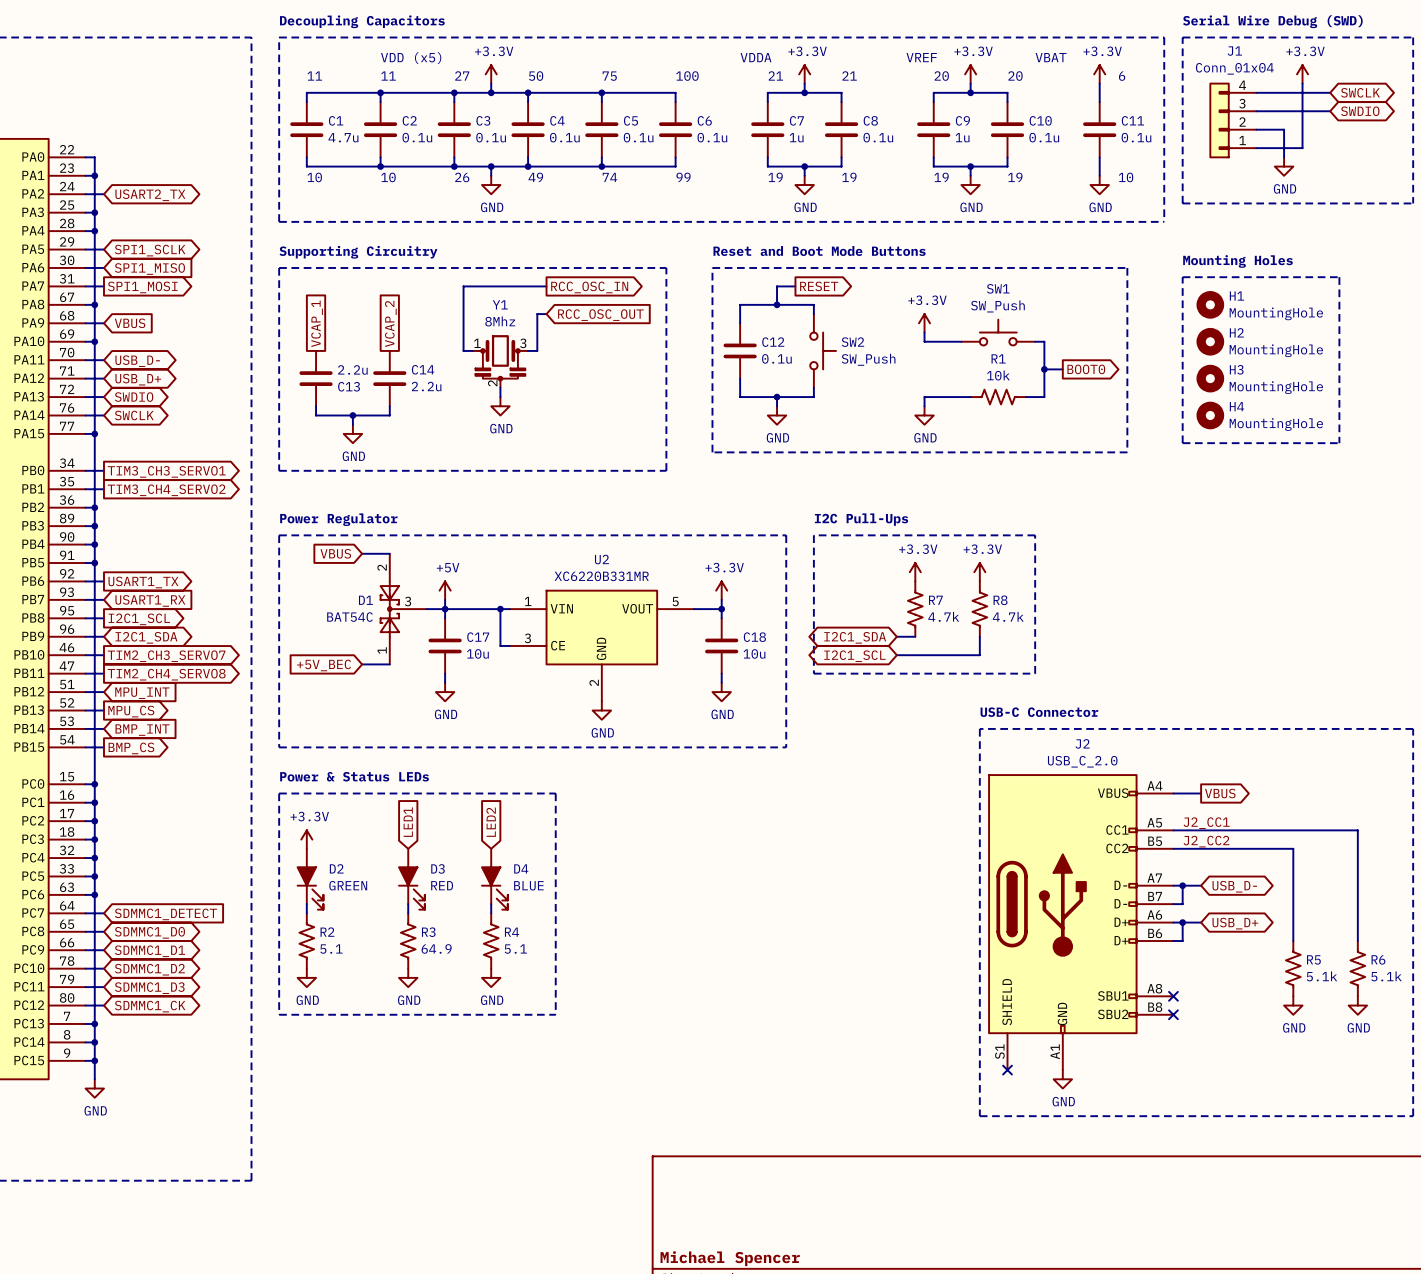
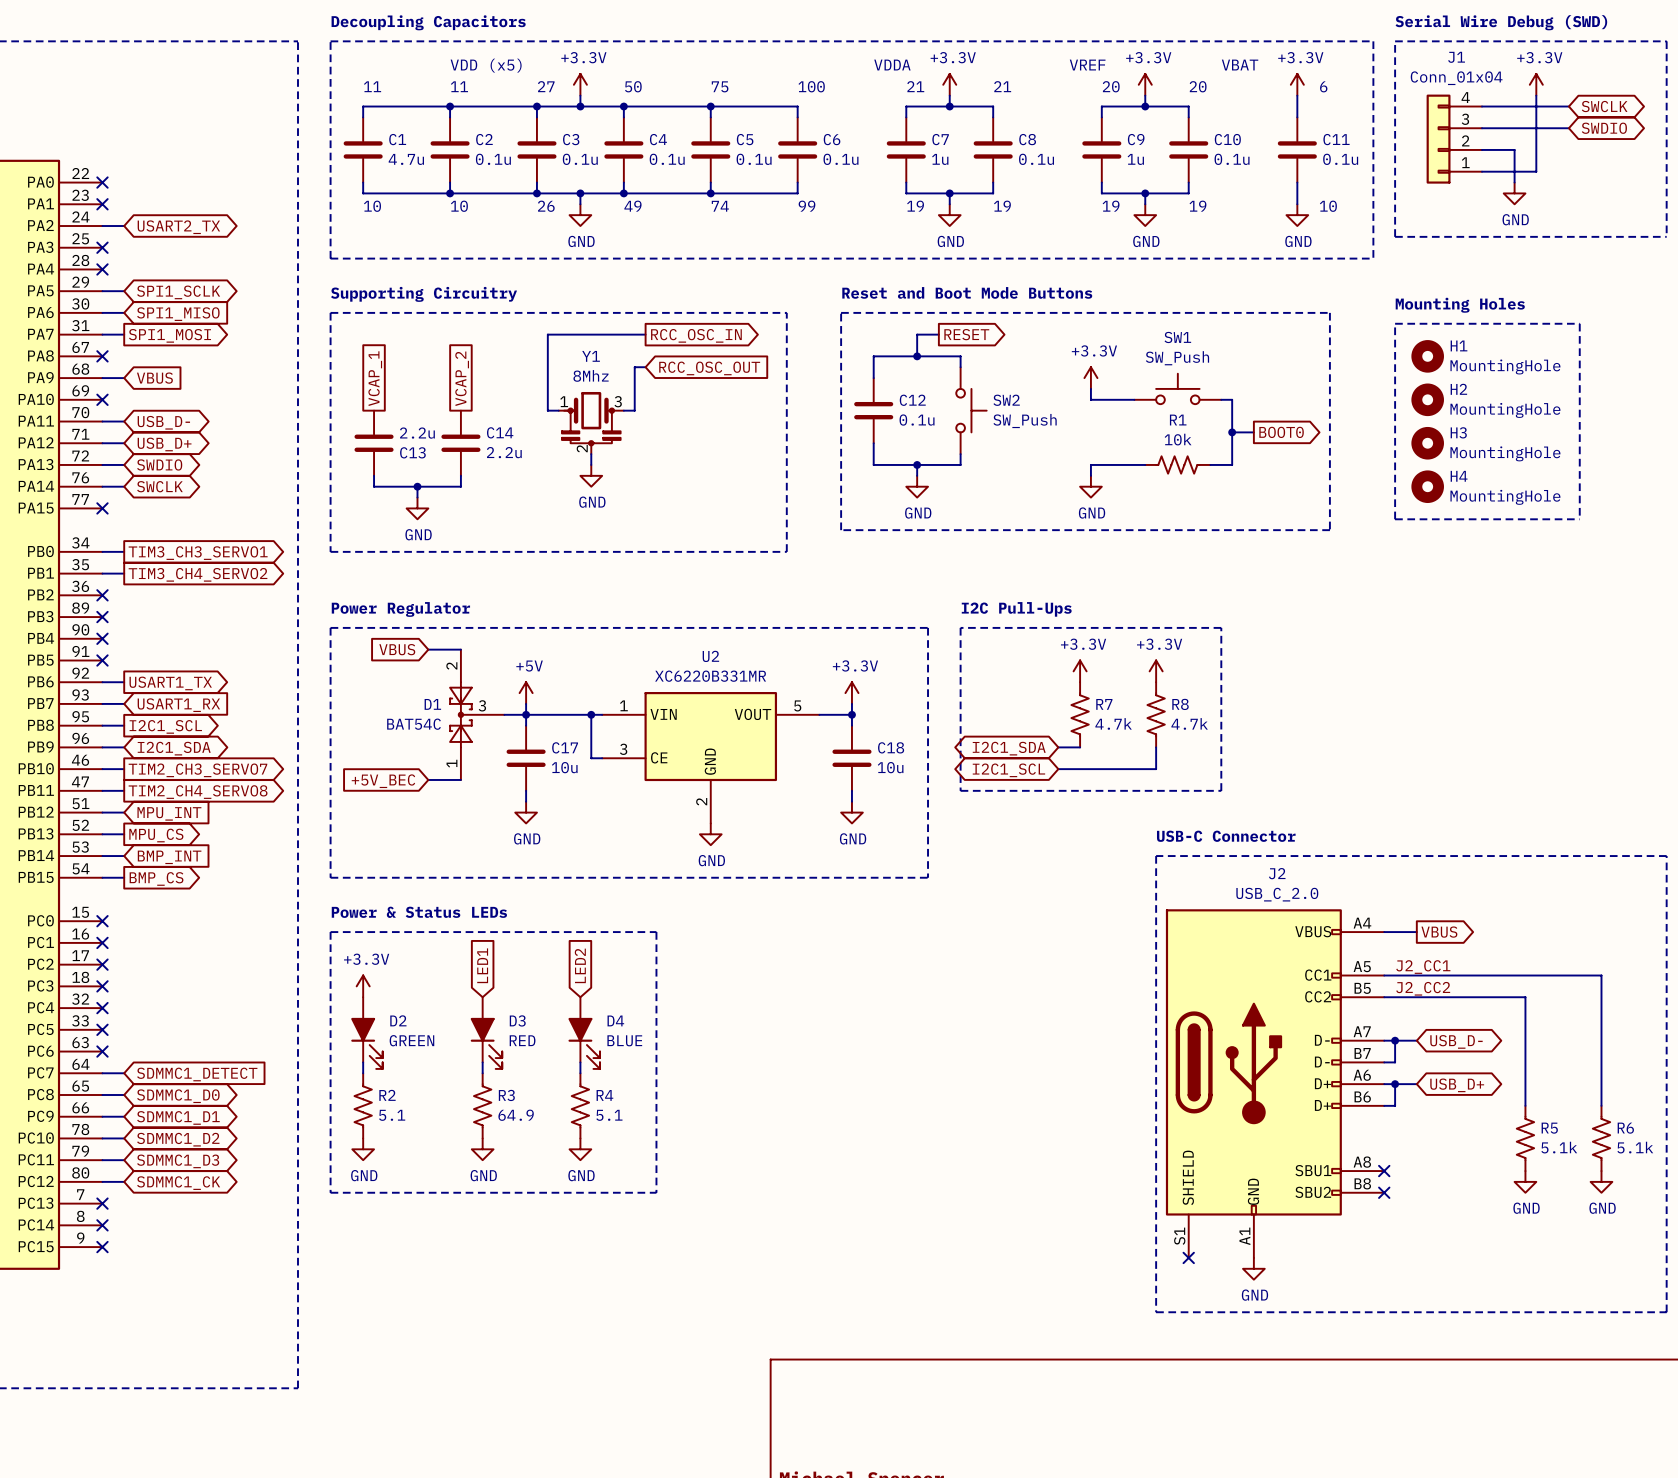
wire: (85, 157) (94, 157) (94, 1079) -> none
no-connect mark: none -> (102, 182)
wire: (85, 175) (94, 175) -> none
no-connect mark: none -> (102, 204)
junction: (94, 175) -> none
wire: (85, 212) (94, 212) -> none
no-connect mark: none -> (102, 247)
junction: (94, 212) -> none
wire: (85, 231) (94, 231) -> none
no-connect mark: none -> (102, 269)
junction: (94, 231) -> none
wire: (85, 304) (94, 304) -> none
no-connect mark: none -> (102, 356)
junction: (94, 304) -> none
wire: (85, 341) (94, 341) -> none
no-connect mark: none -> (102, 399)
junction: (94, 341) -> none
wire: (85, 433) (94, 433) -> none
no-connect mark: none -> (102, 508)
junction: (94, 433) -> none
wire: (85, 507) (94, 507) -> none
no-connect mark: none -> (102, 595)
junction: (94, 507) -> none
wire: (85, 526) (94, 526) -> none
no-connect mark: none -> (102, 617)
junction: (94, 526) -> none
wire: (85, 544) (94, 544) -> none
no-connect mark: none -> (102, 638)
junction: (94, 544) -> none
wire: (85, 563) (94, 563) -> none
no-connect mark: none -> (102, 660)
junction: (94, 563) -> none
wire: (85, 784) (94, 784) -> none
no-connect mark: none -> (102, 921)
junction: (94, 784) -> none
wire: (85, 802) (94, 802) -> none
no-connect mark: none -> (102, 942)
junction: (94, 802) -> none
wire: (85, 821) (94, 821) -> none
no-connect mark: none -> (102, 964)
junction: (94, 821) -> none
wire: (85, 839) (94, 839) -> none
no-connect mark: none -> (102, 986)
junction: (94, 839) -> none
wire: (85, 858) (94, 858) -> none
no-connect mark: none -> (102, 1008)
junction: (94, 858) -> none
wire: (85, 876) (94, 876) -> none
no-connect mark: none -> (102, 1029)
junction: (94, 876) -> none
wire: (85, 894) (94, 894) -> none
no-connect mark: none -> (102, 1051)
junction: (94, 894) -> none
wire: (85, 1023) (94, 1023) -> none
no-connect mark: none -> (102, 1203)
junction: (94, 1023) -> none
wire: (85, 1042) (94, 1042) -> none
no-connect mark: none -> (102, 1225)
junction: (94, 1042) -> none
wire: (85, 1060) (94, 1060) -> none
no-connect mark: none -> (102, 1247)
junction: (94, 1060) -> none
power symbol: GND (94, 1088) -> none

